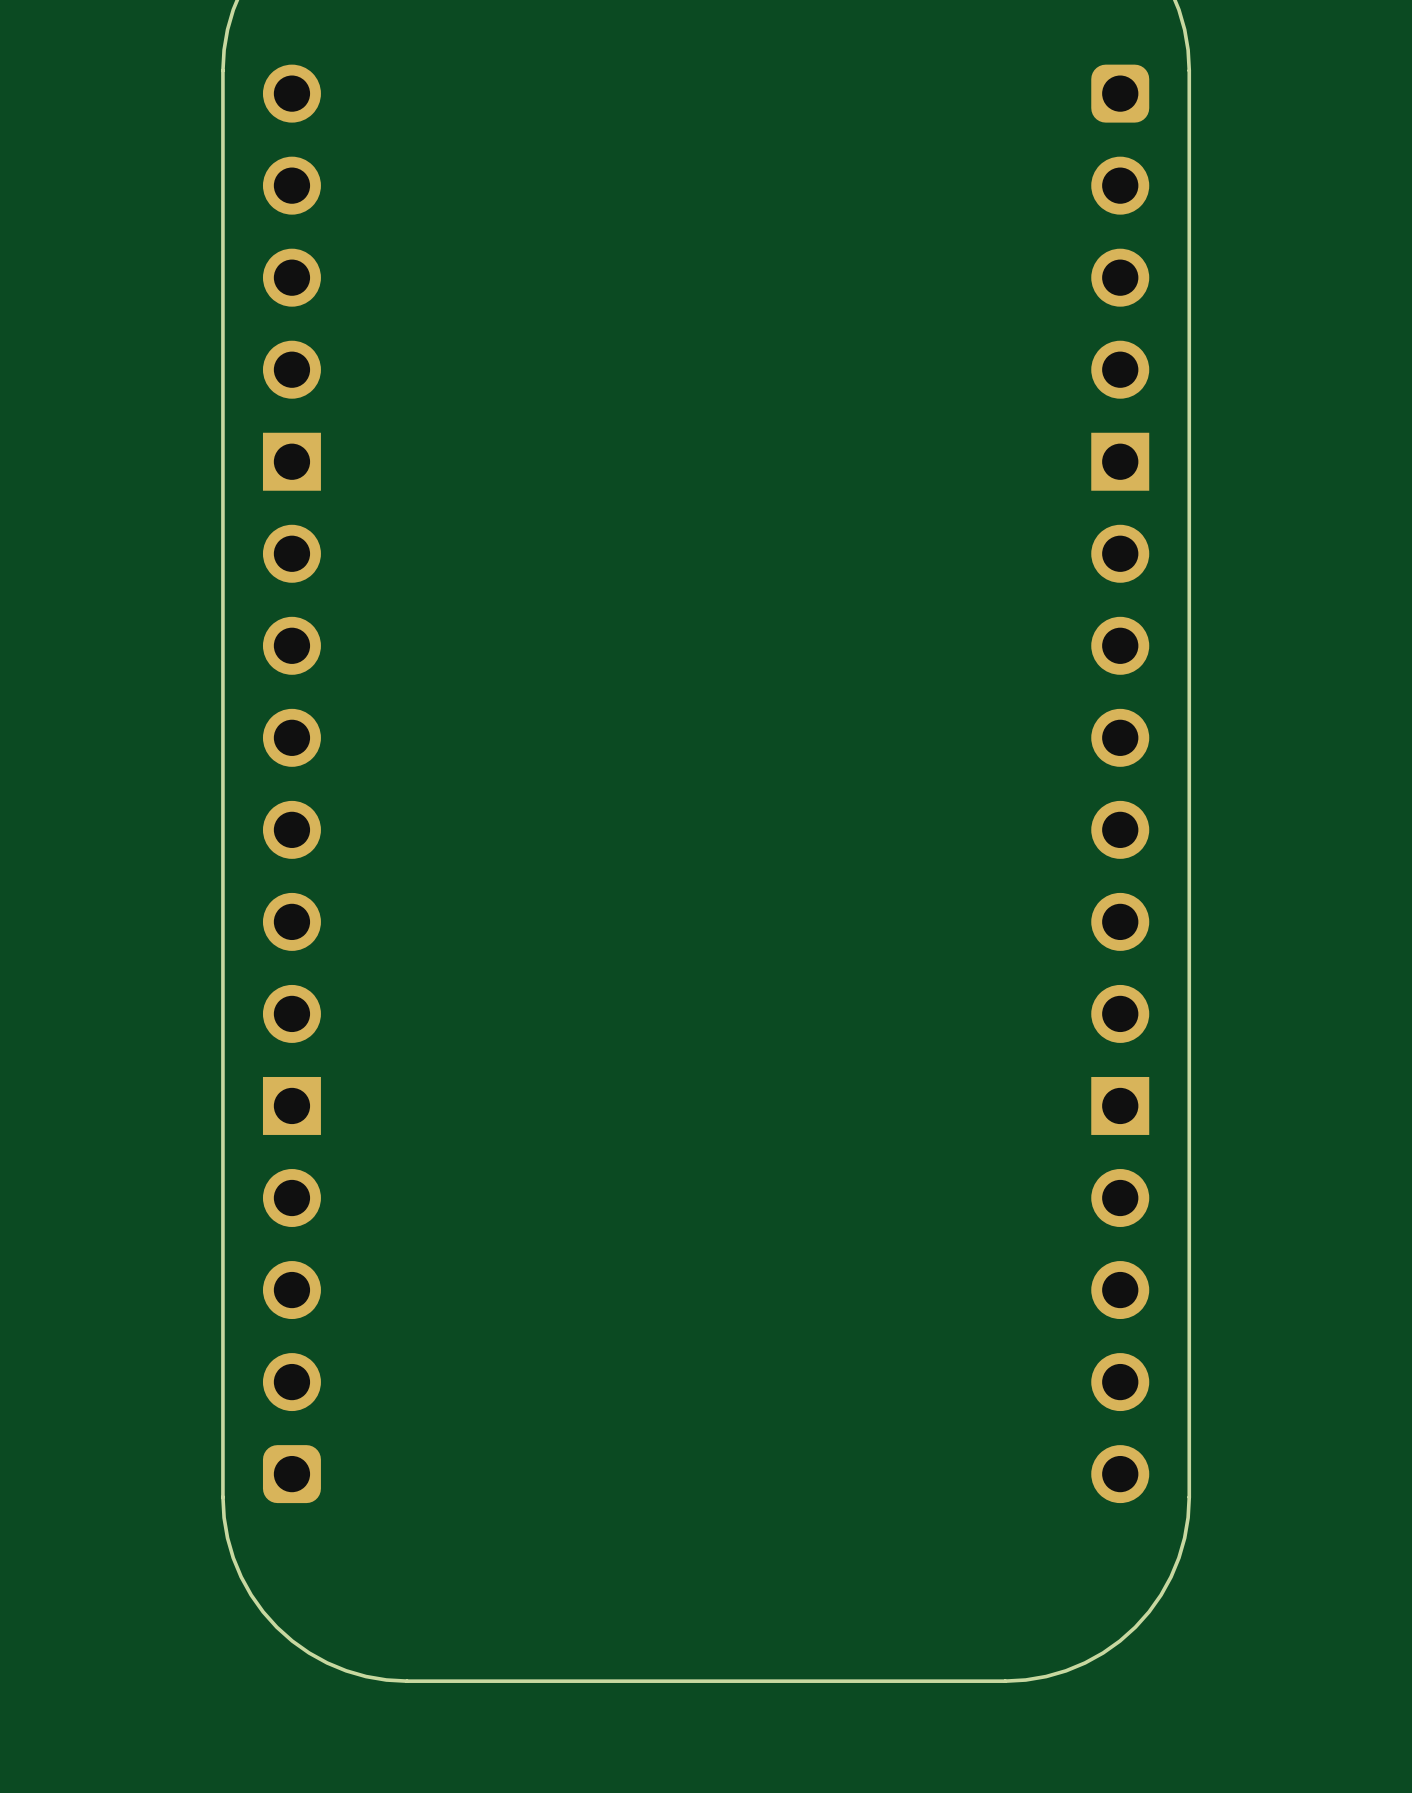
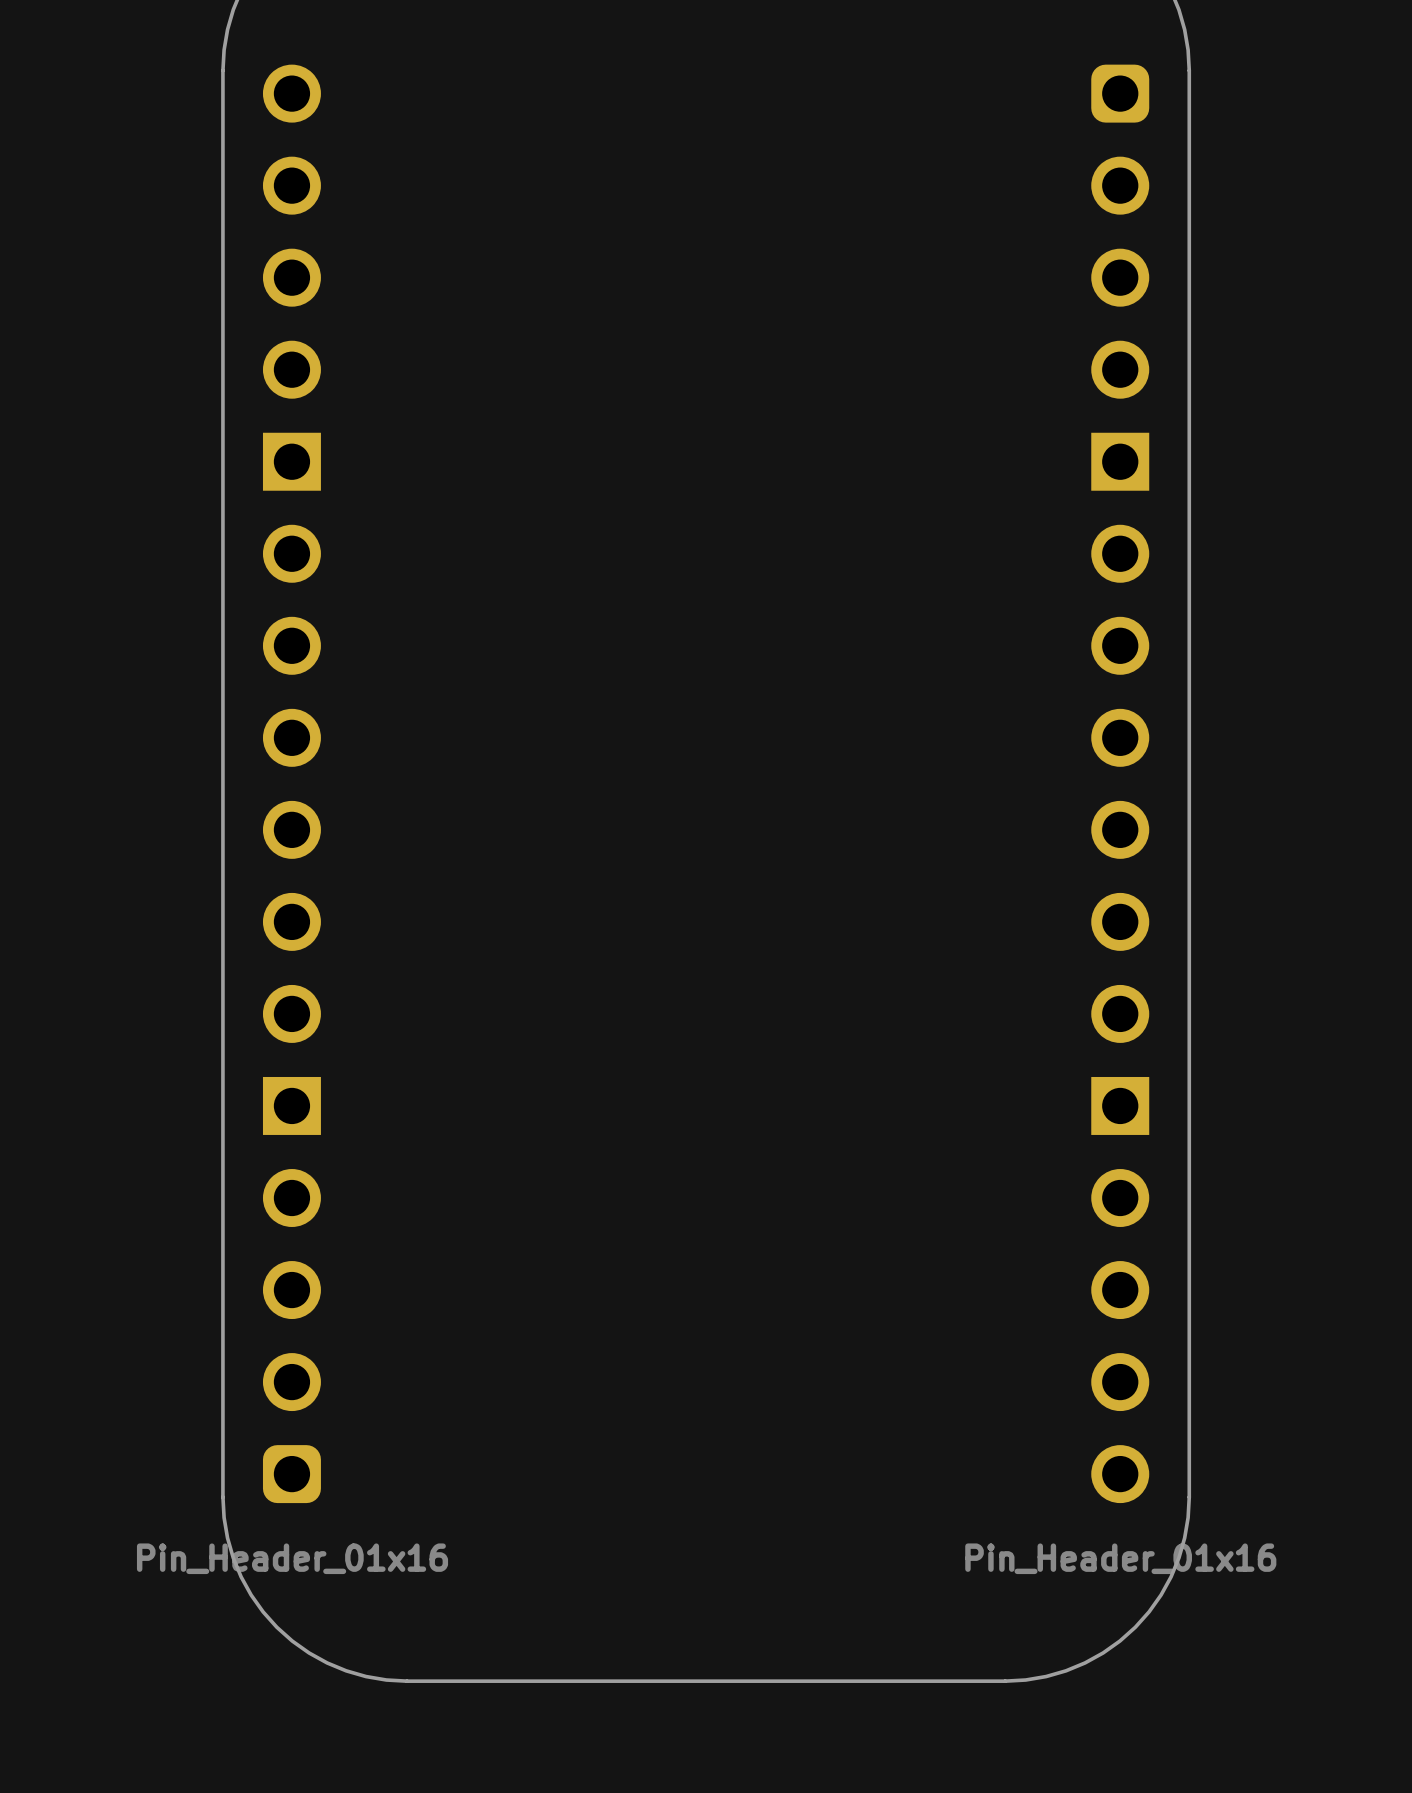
drawing: none -> [136, 1543, 449, 1575]
drawing: none -> [965, 1543, 1277, 1575]

